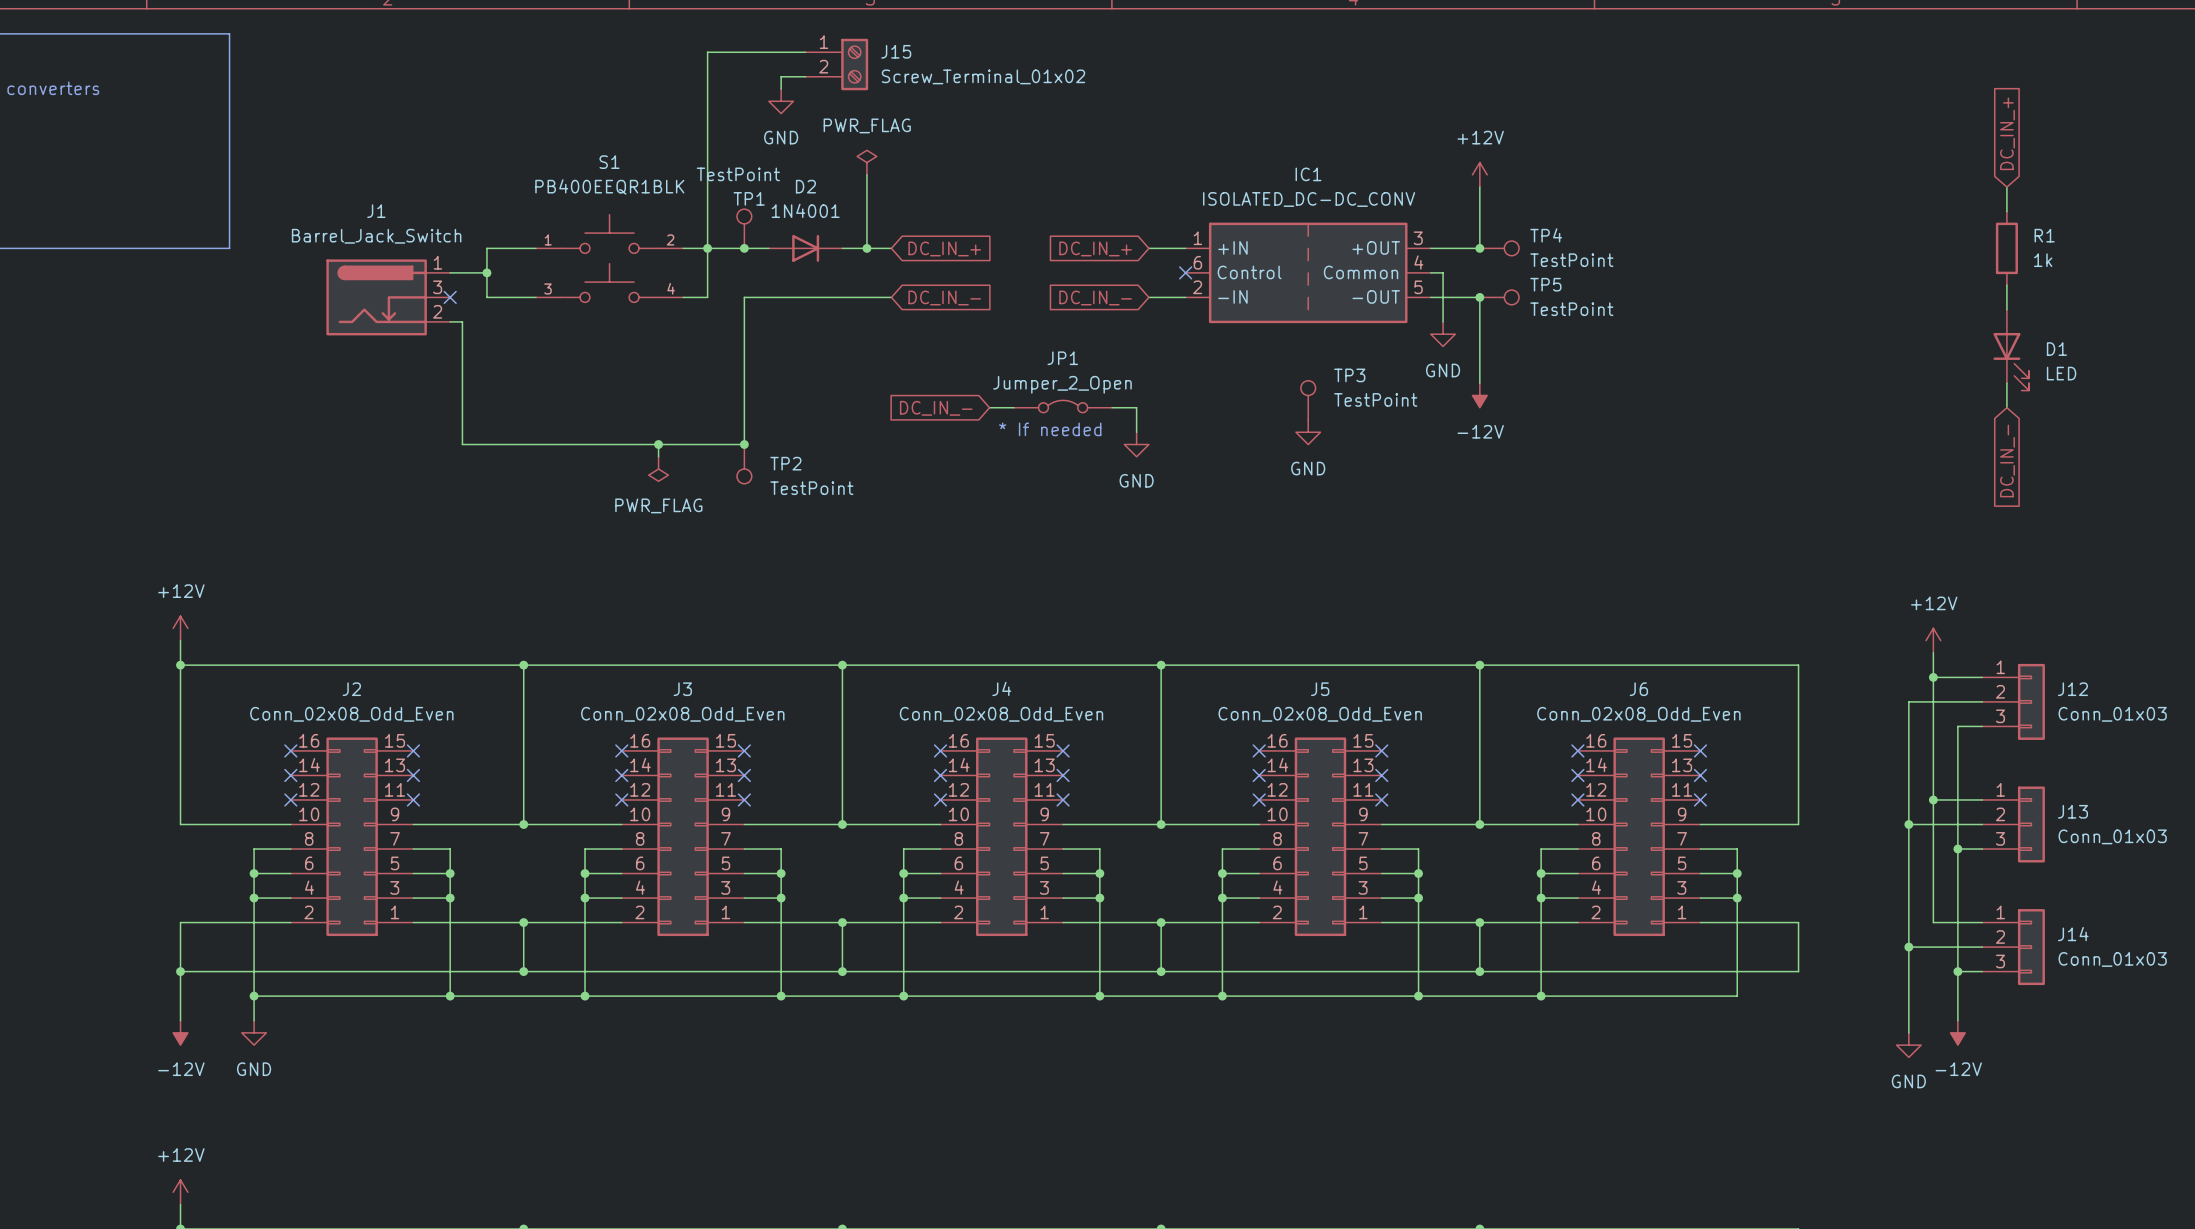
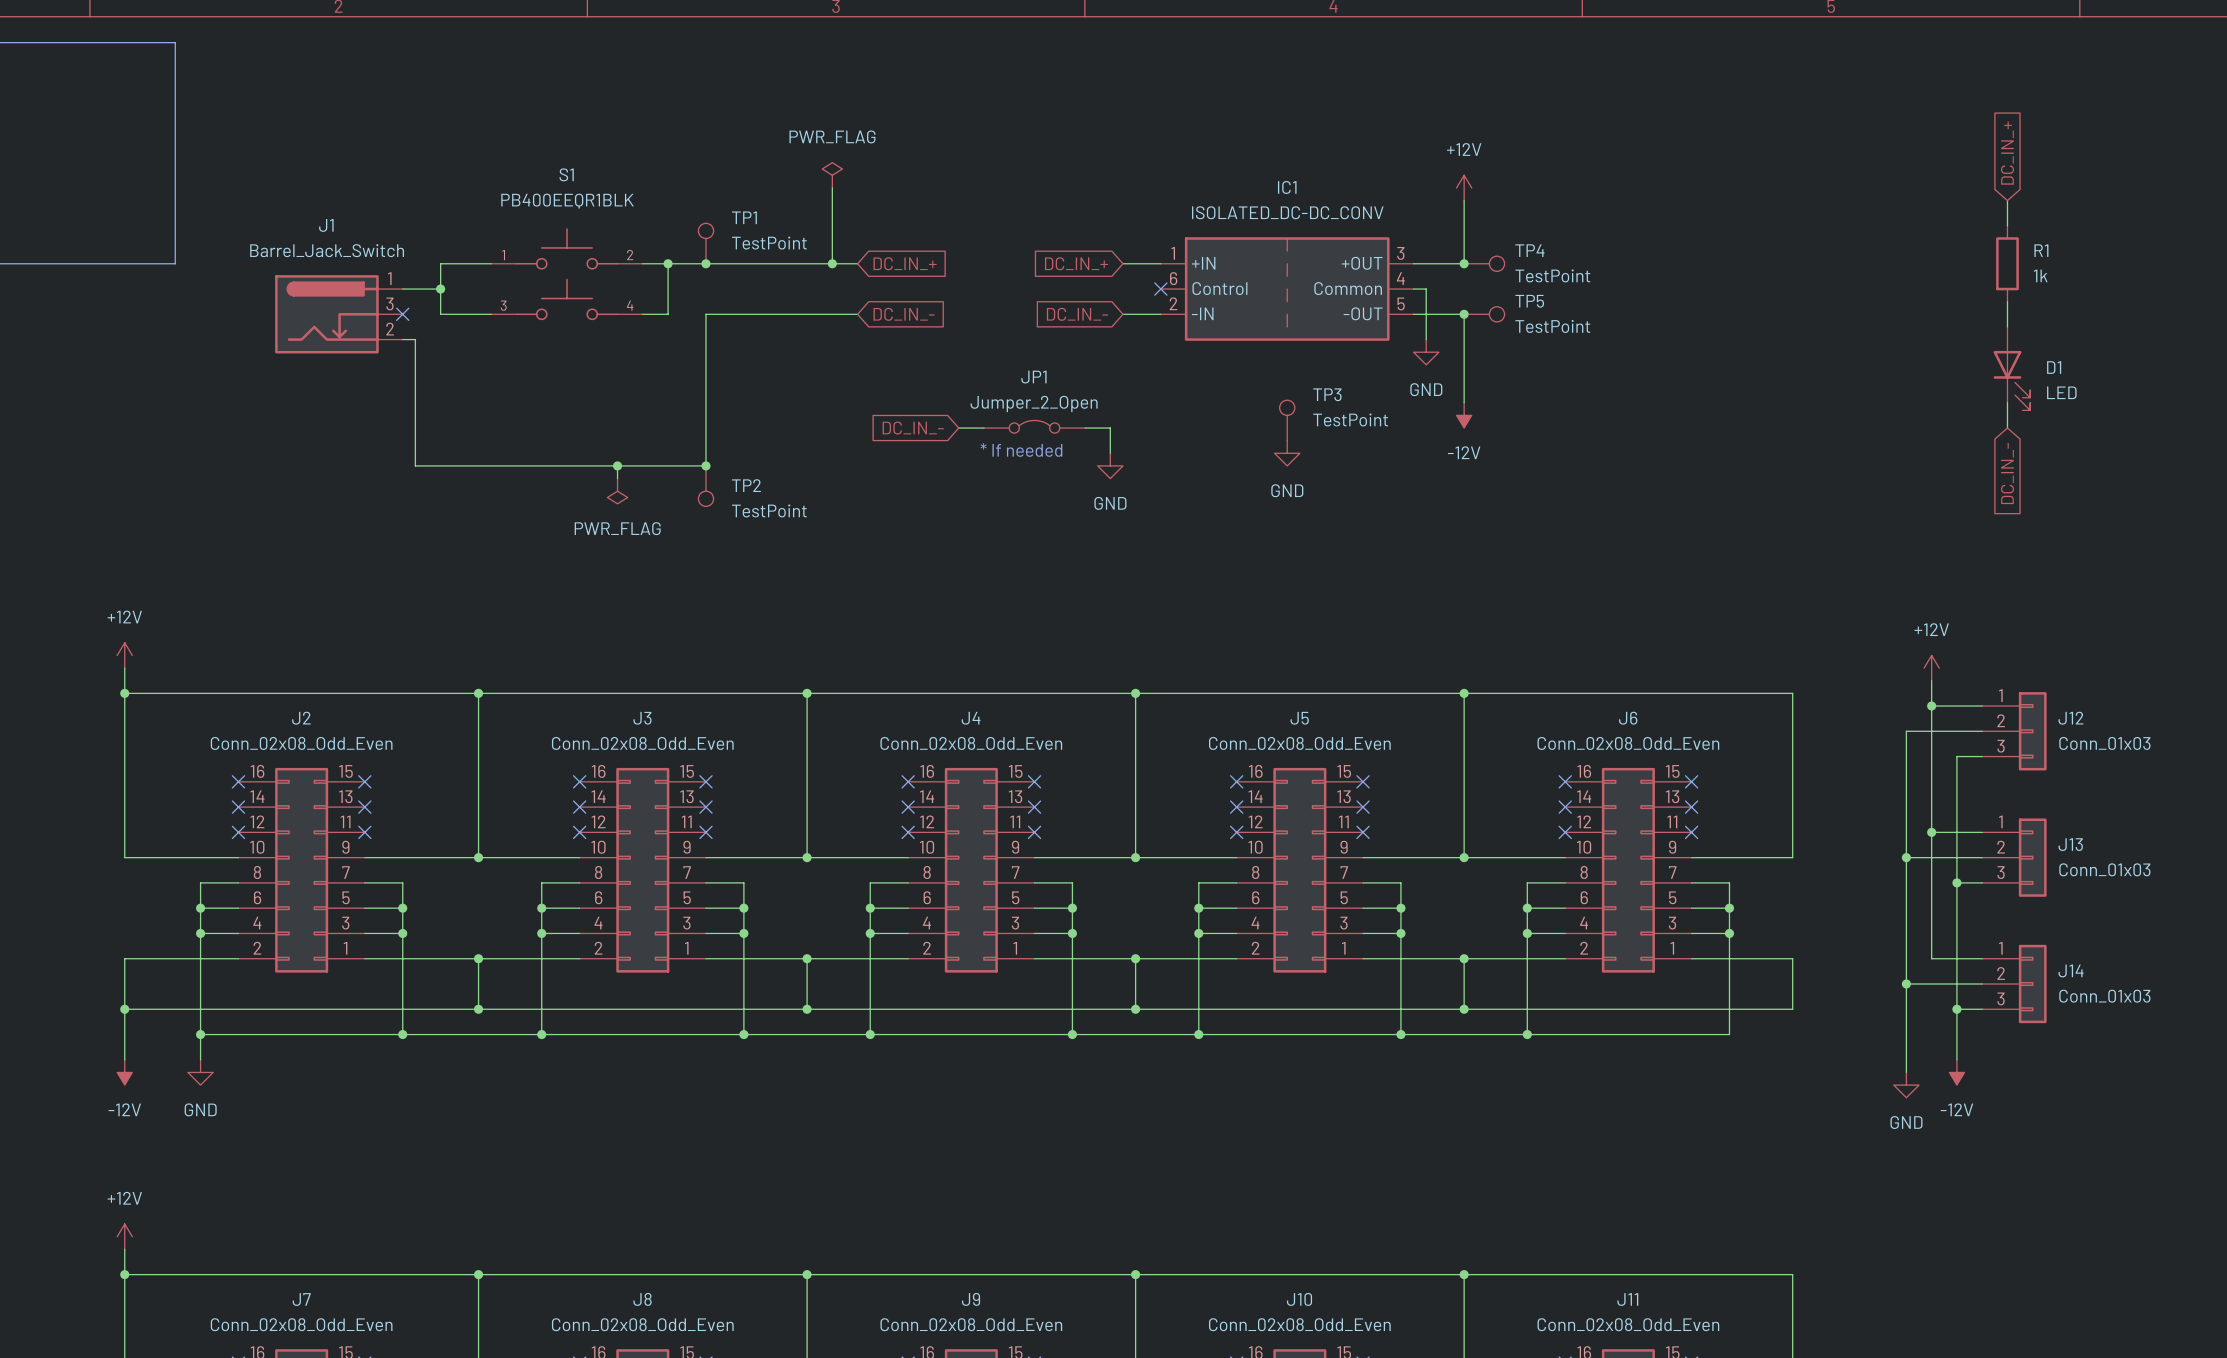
wire: (805, 52) (707, 52) (707, 248) -> none
J15: Screw_Terminal_01x02 (836, 64) -> none
wire: (805, 76) (781, 76) (781, 89) -> none
power symbol: GND (781, 101) -> none
TP1 value position: TestPoint (738, 174) -> TestPoint (769, 243)
TP1 name position: TP1 (749, 198) -> TP1 (744, 217)
D2: 1N4001 (805, 248) -> none

